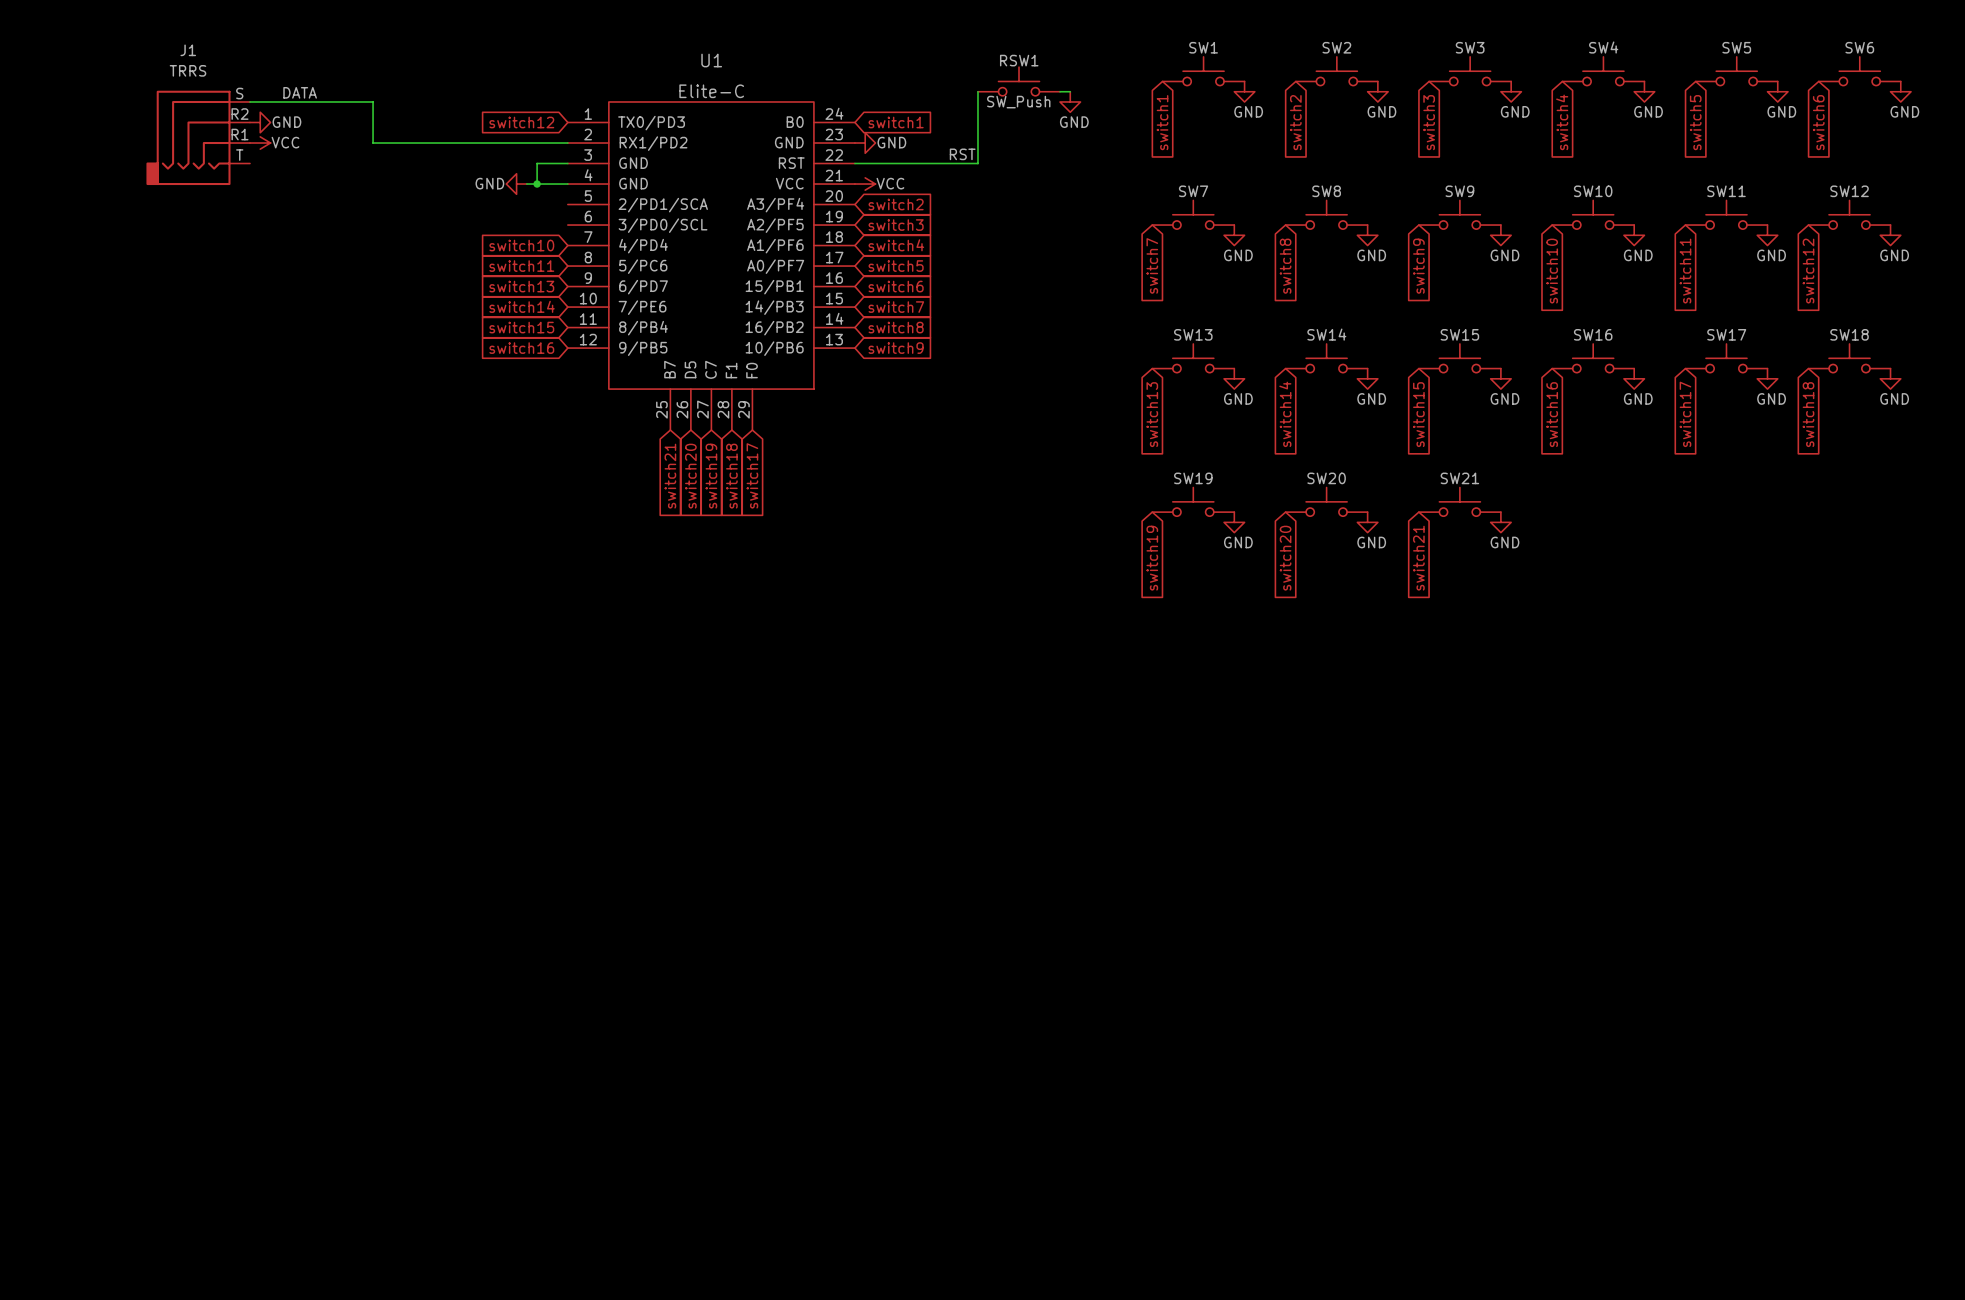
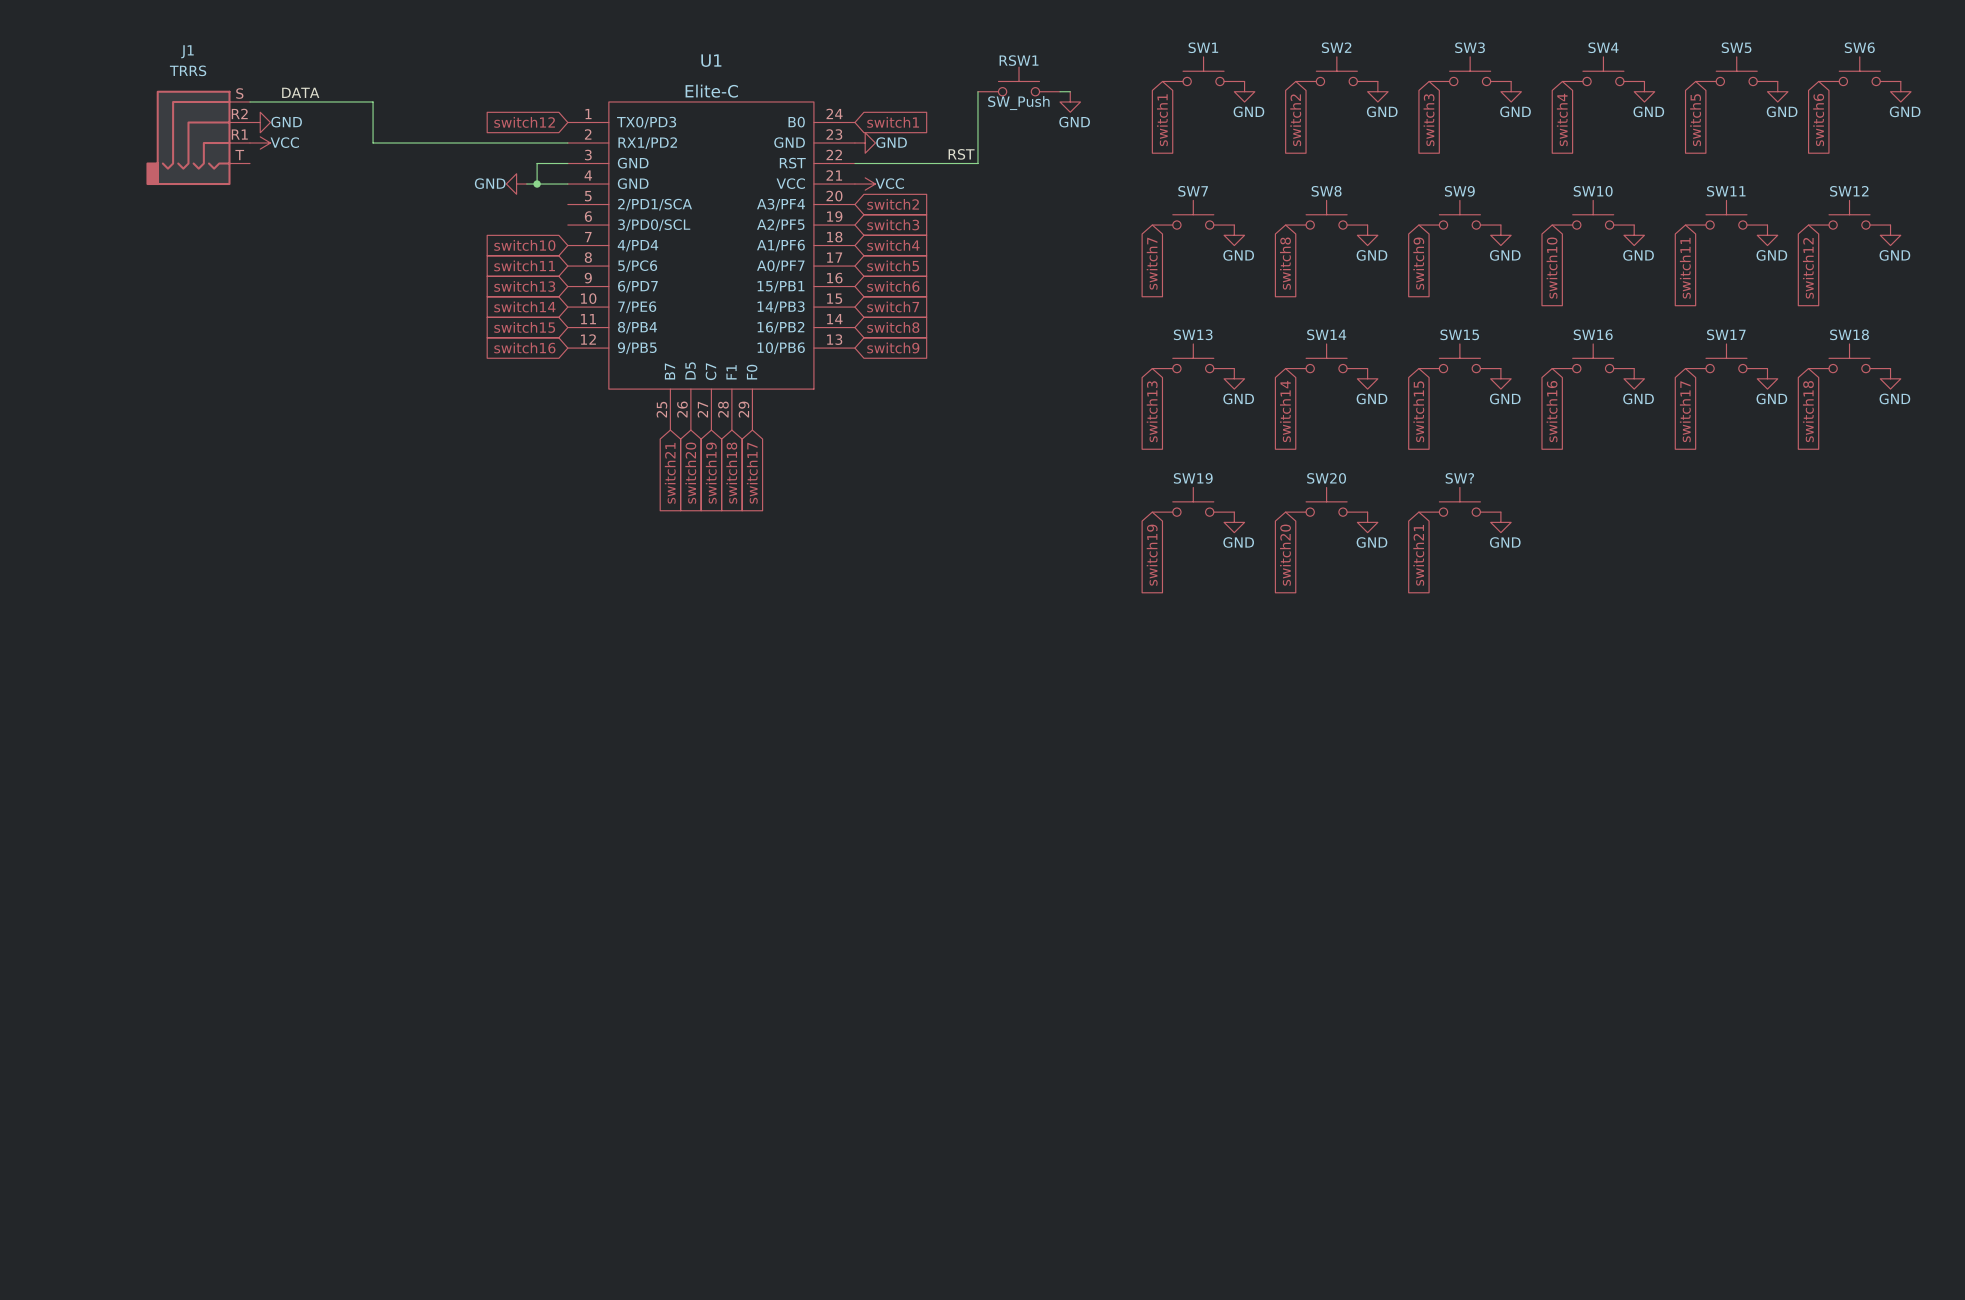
SW21 name: SW21 (1459, 478) -> SW? (1459, 478)

